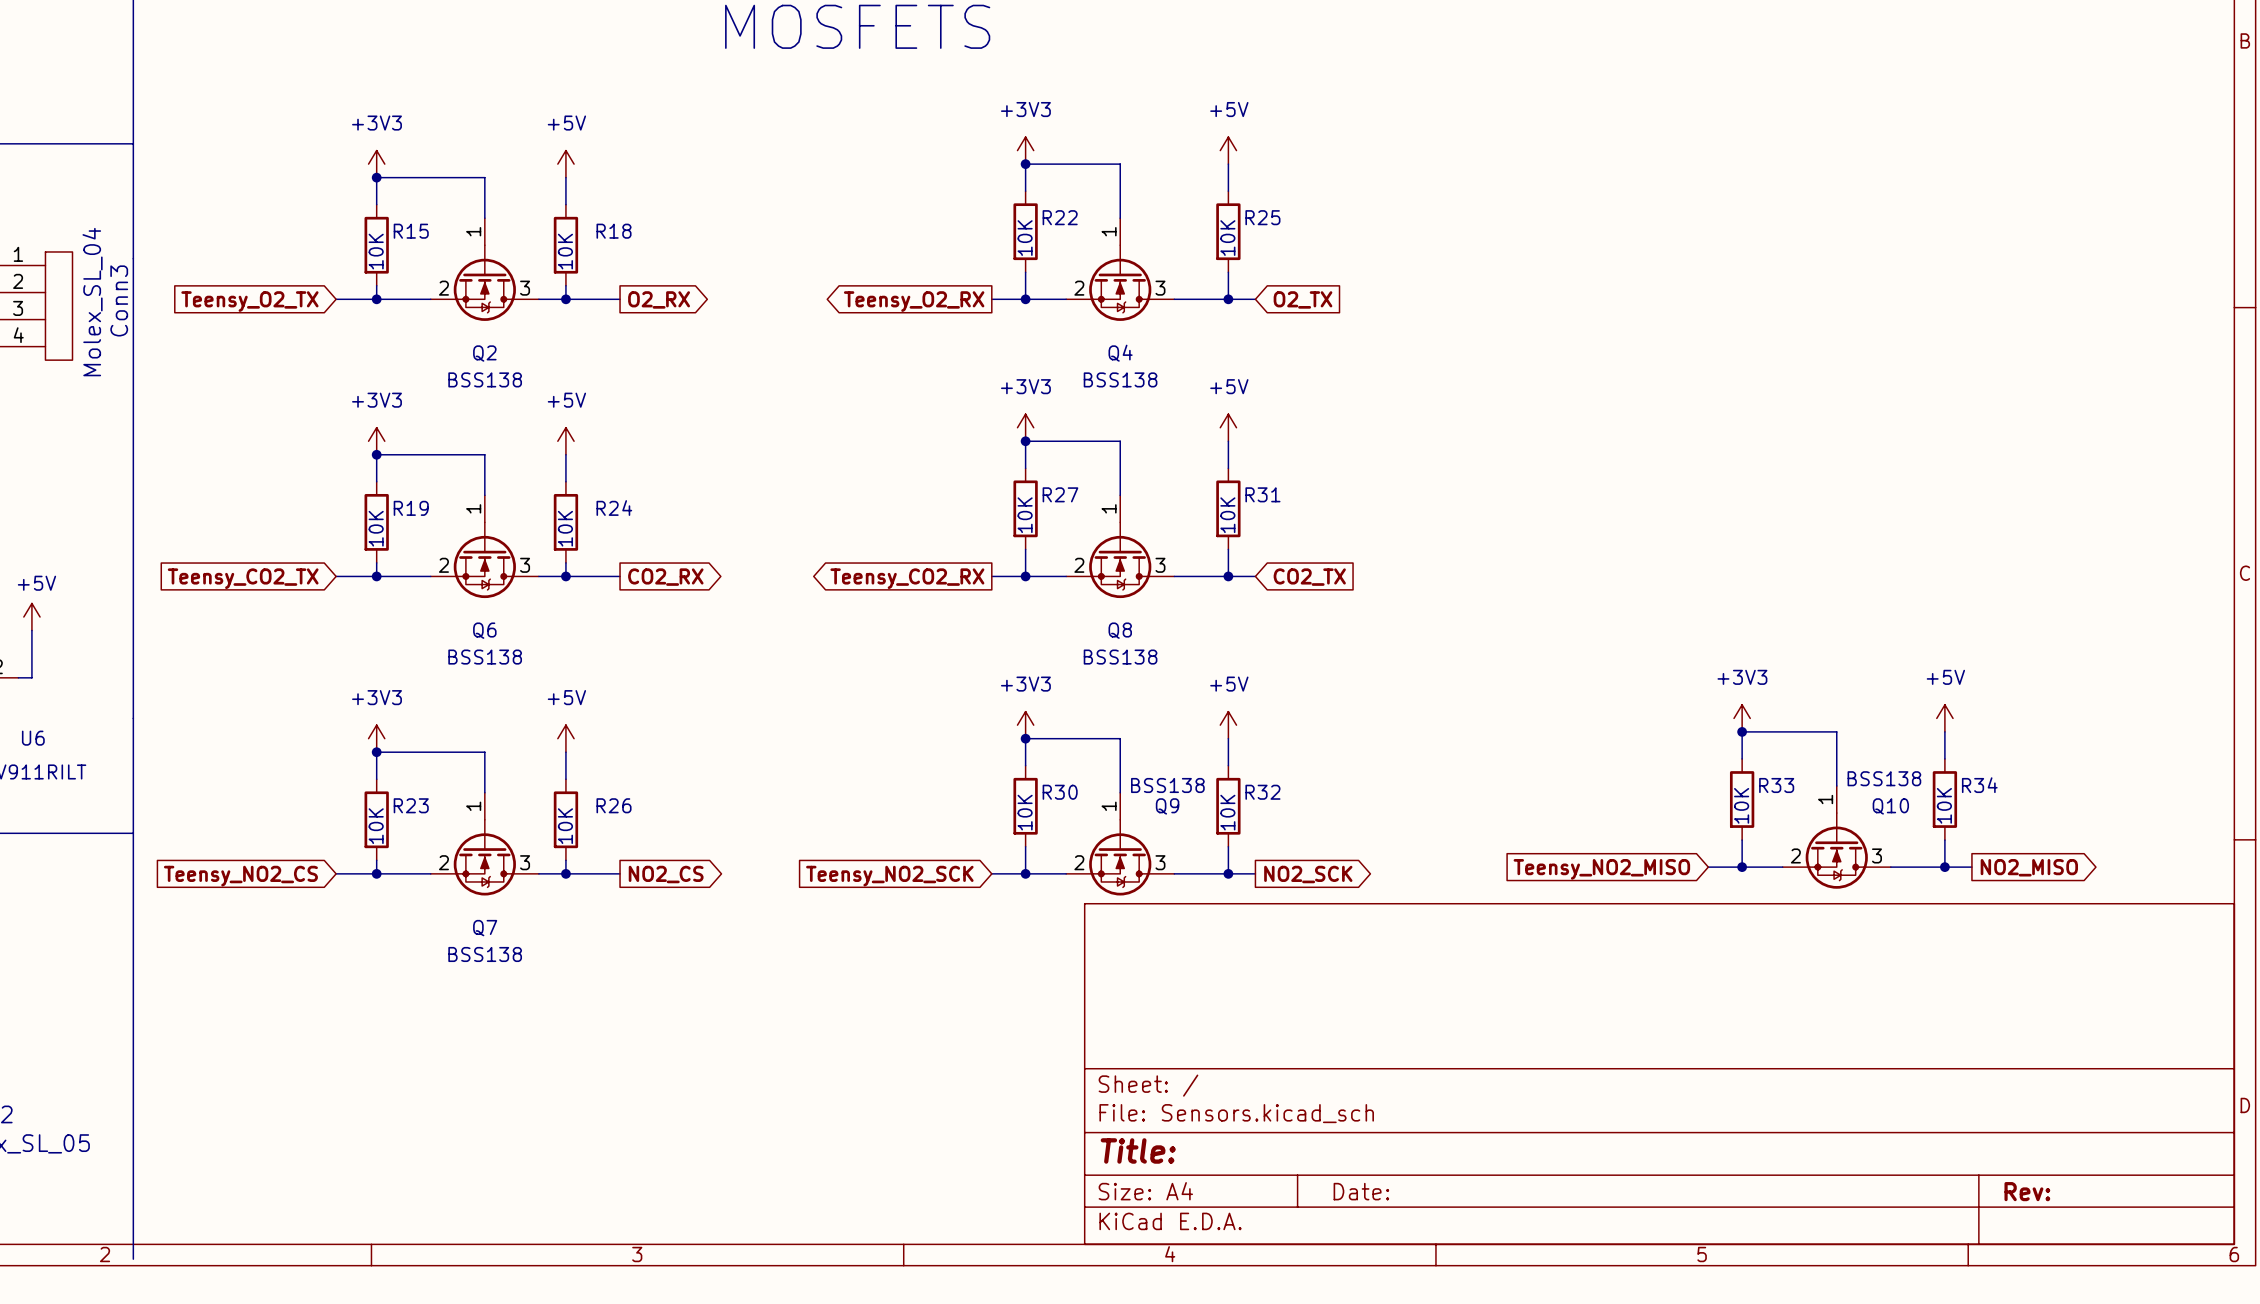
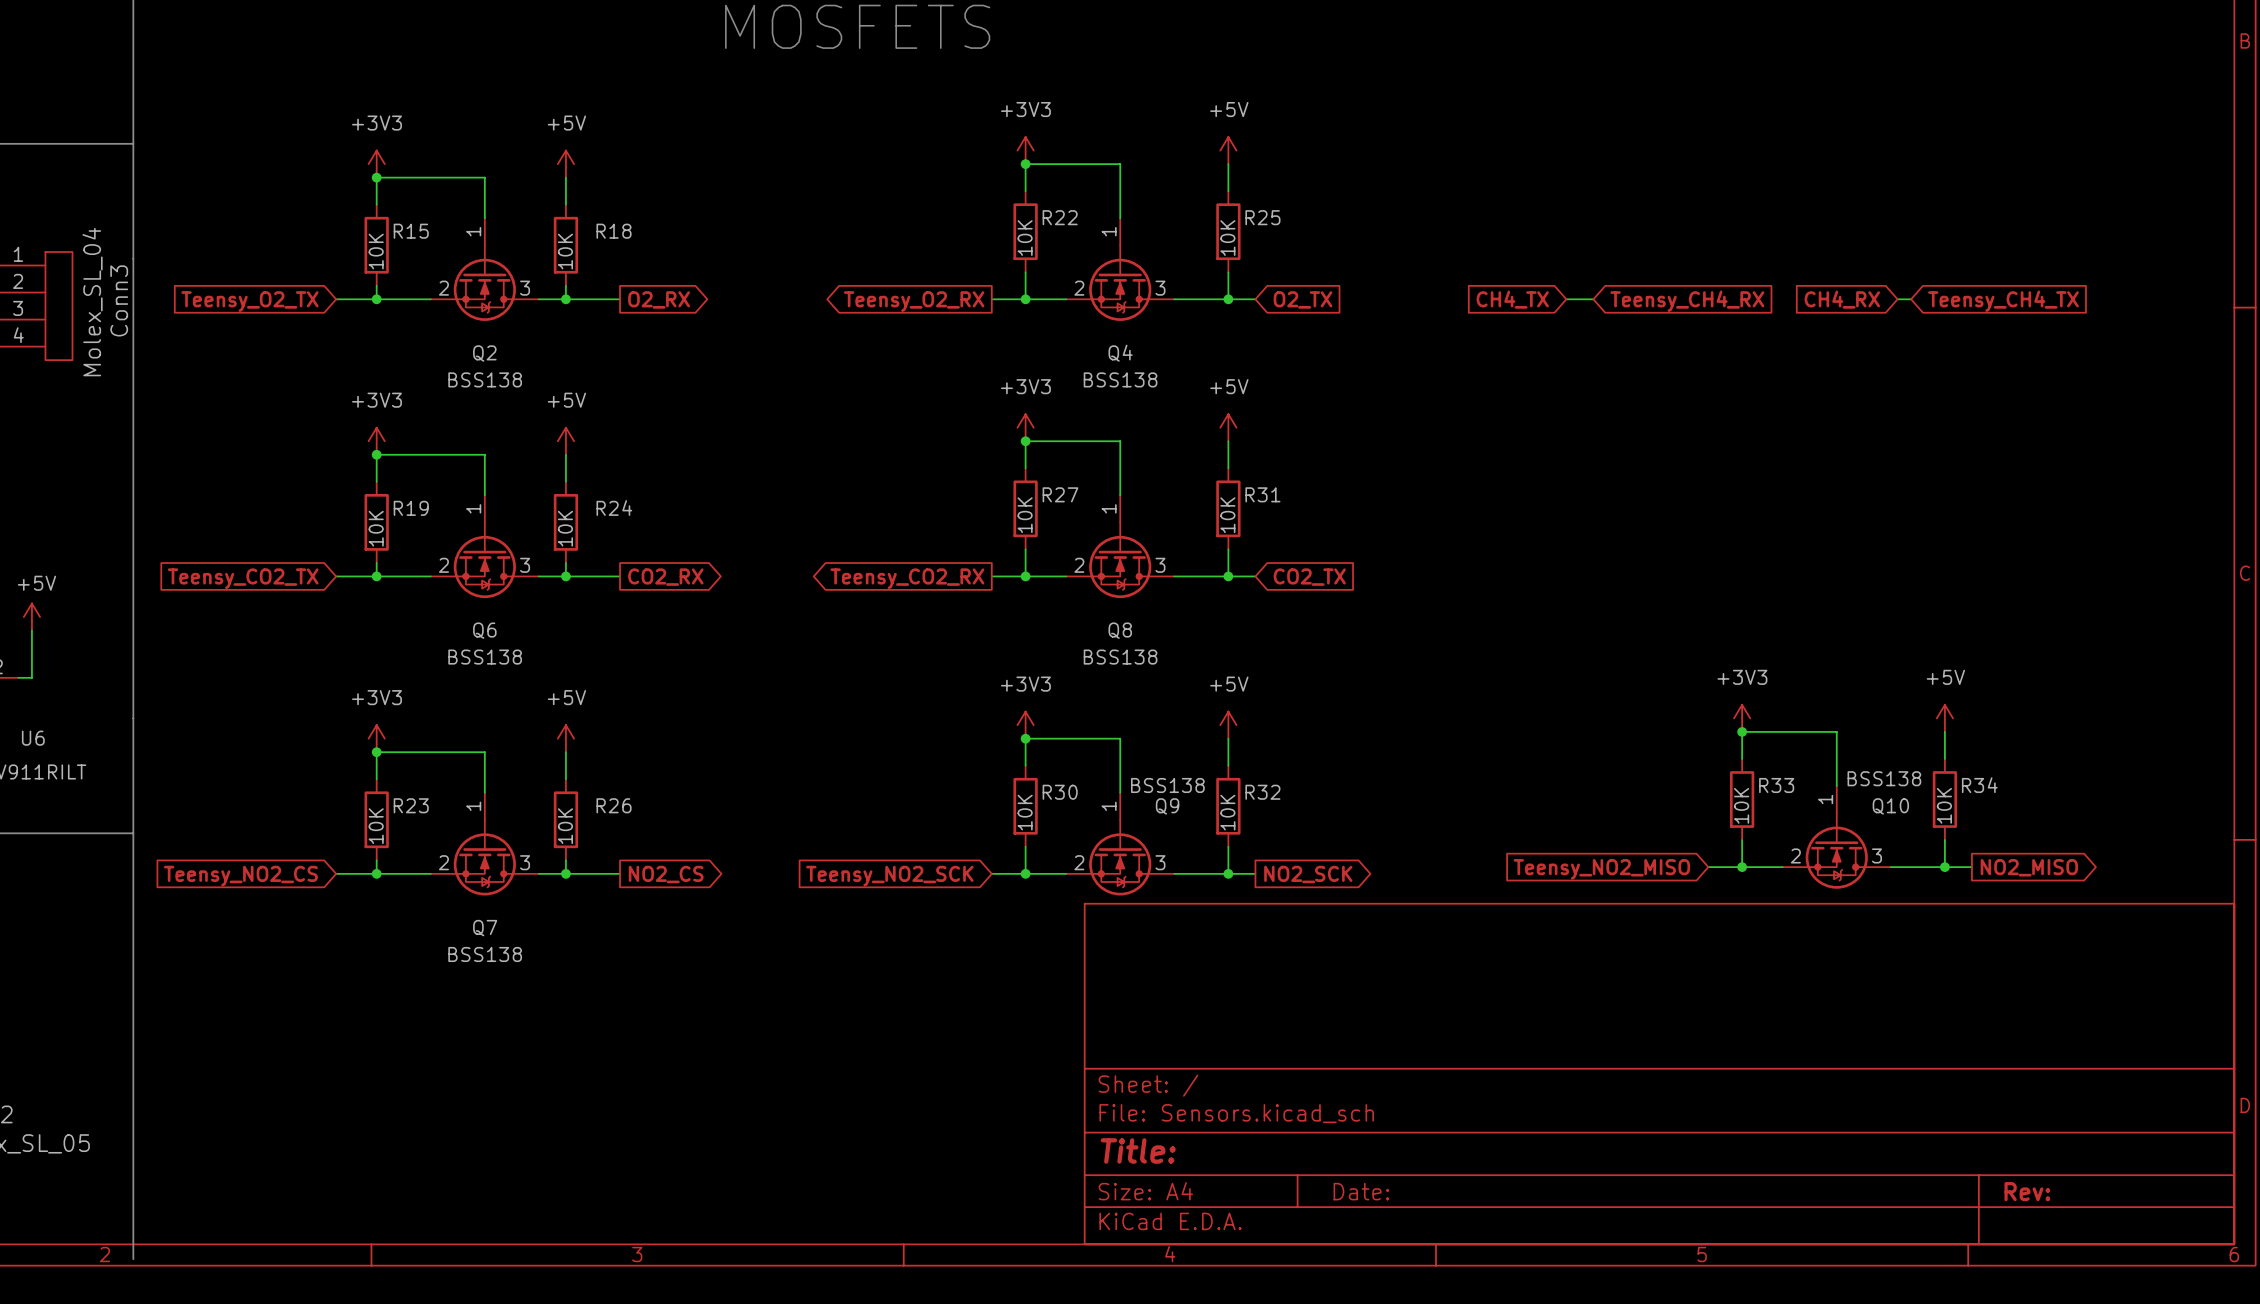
global label: none -> CH4_TX (1512, 299)
wire: none -> (1566, 299) (1593, 299)
global label: none -> CH4_RX (1842, 299)
wire: none -> (1897, 299) (1911, 299)
global label: none -> Teensy_CH4_RX (1687, 301)
global label: none -> Teensy_CH4_TX (2003, 301)

